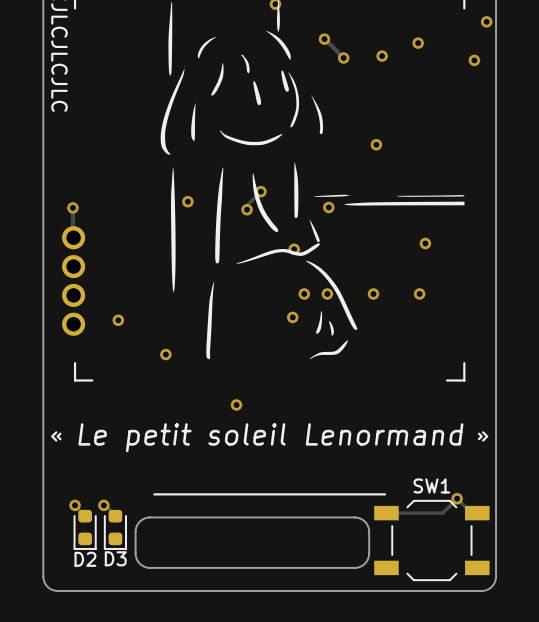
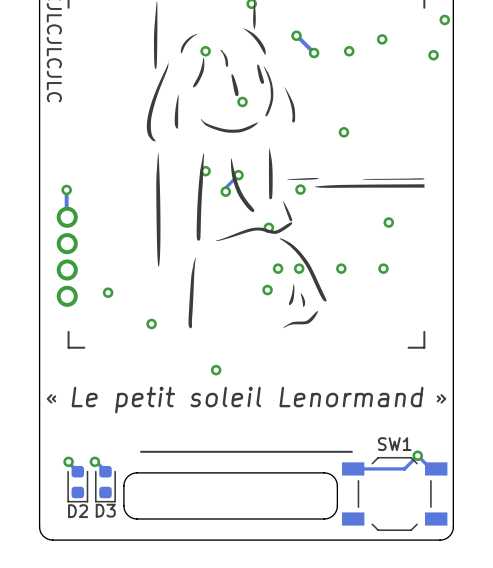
via: none -> (205, 51)
via: none -> (242, 101)
via position: (187, 201) -> (205, 171)

